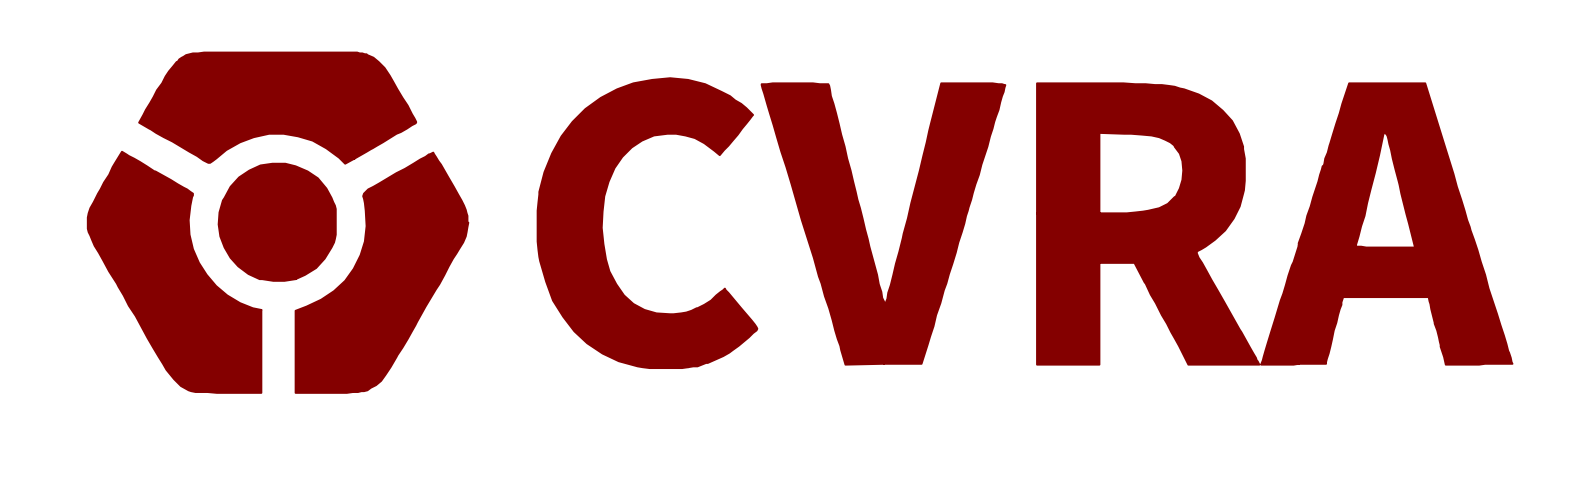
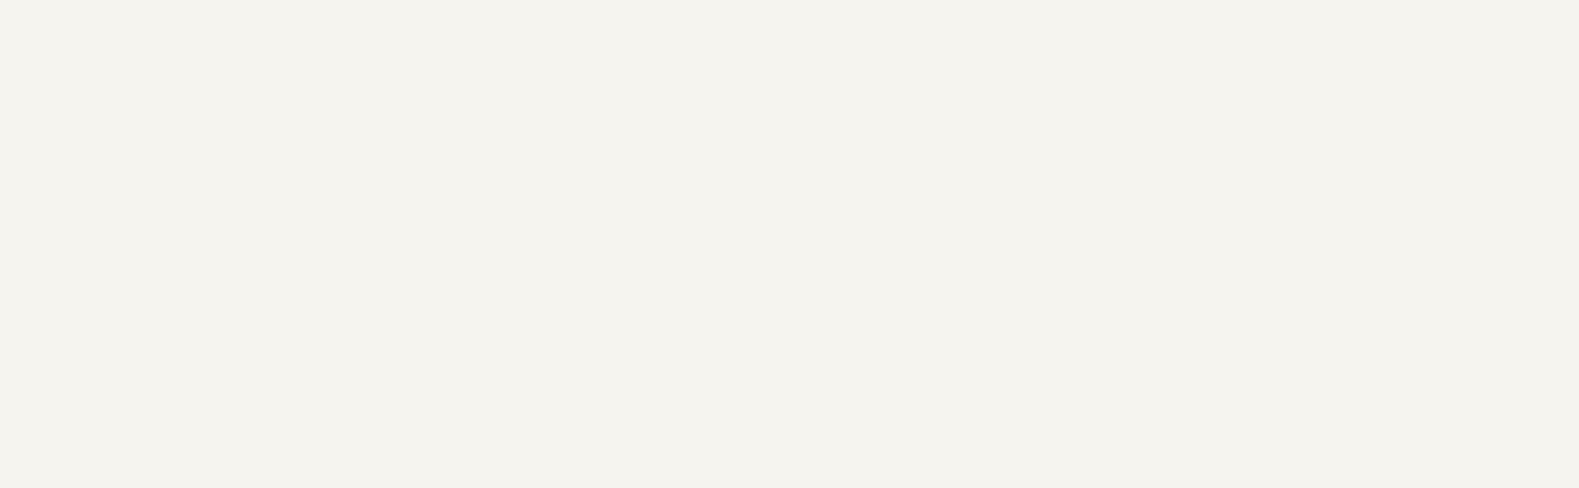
power symbol: (800, 222) -> none

